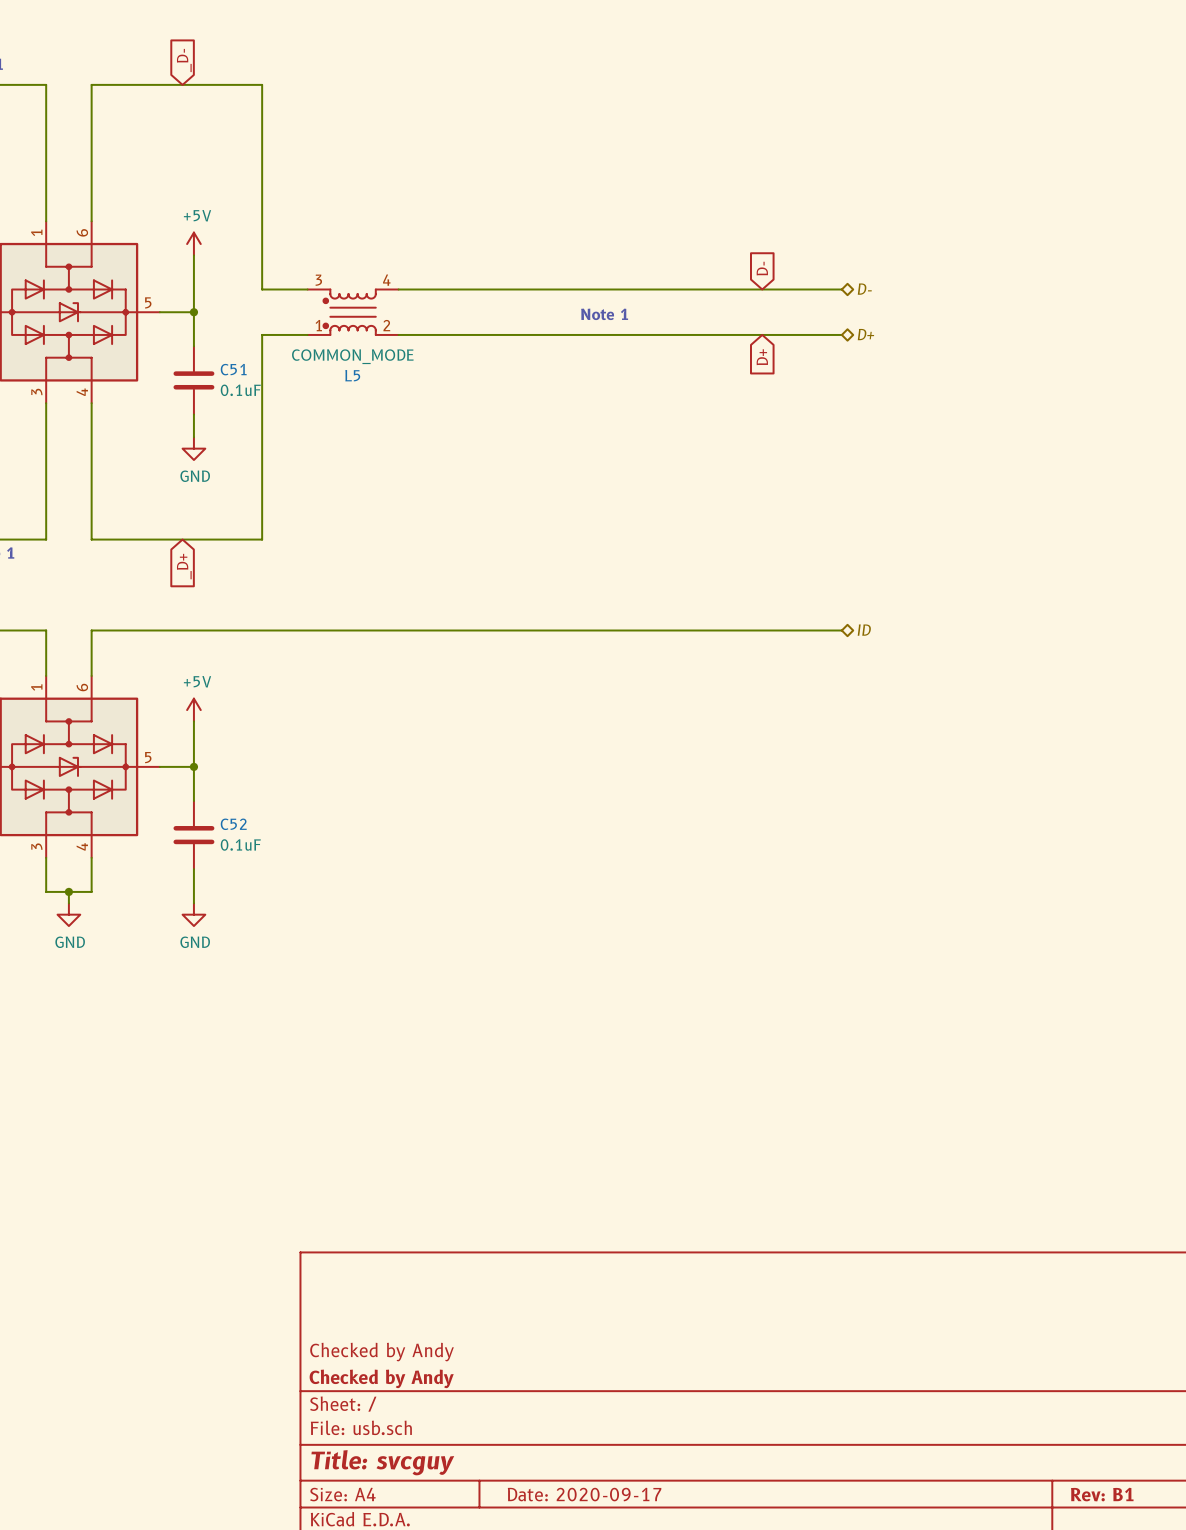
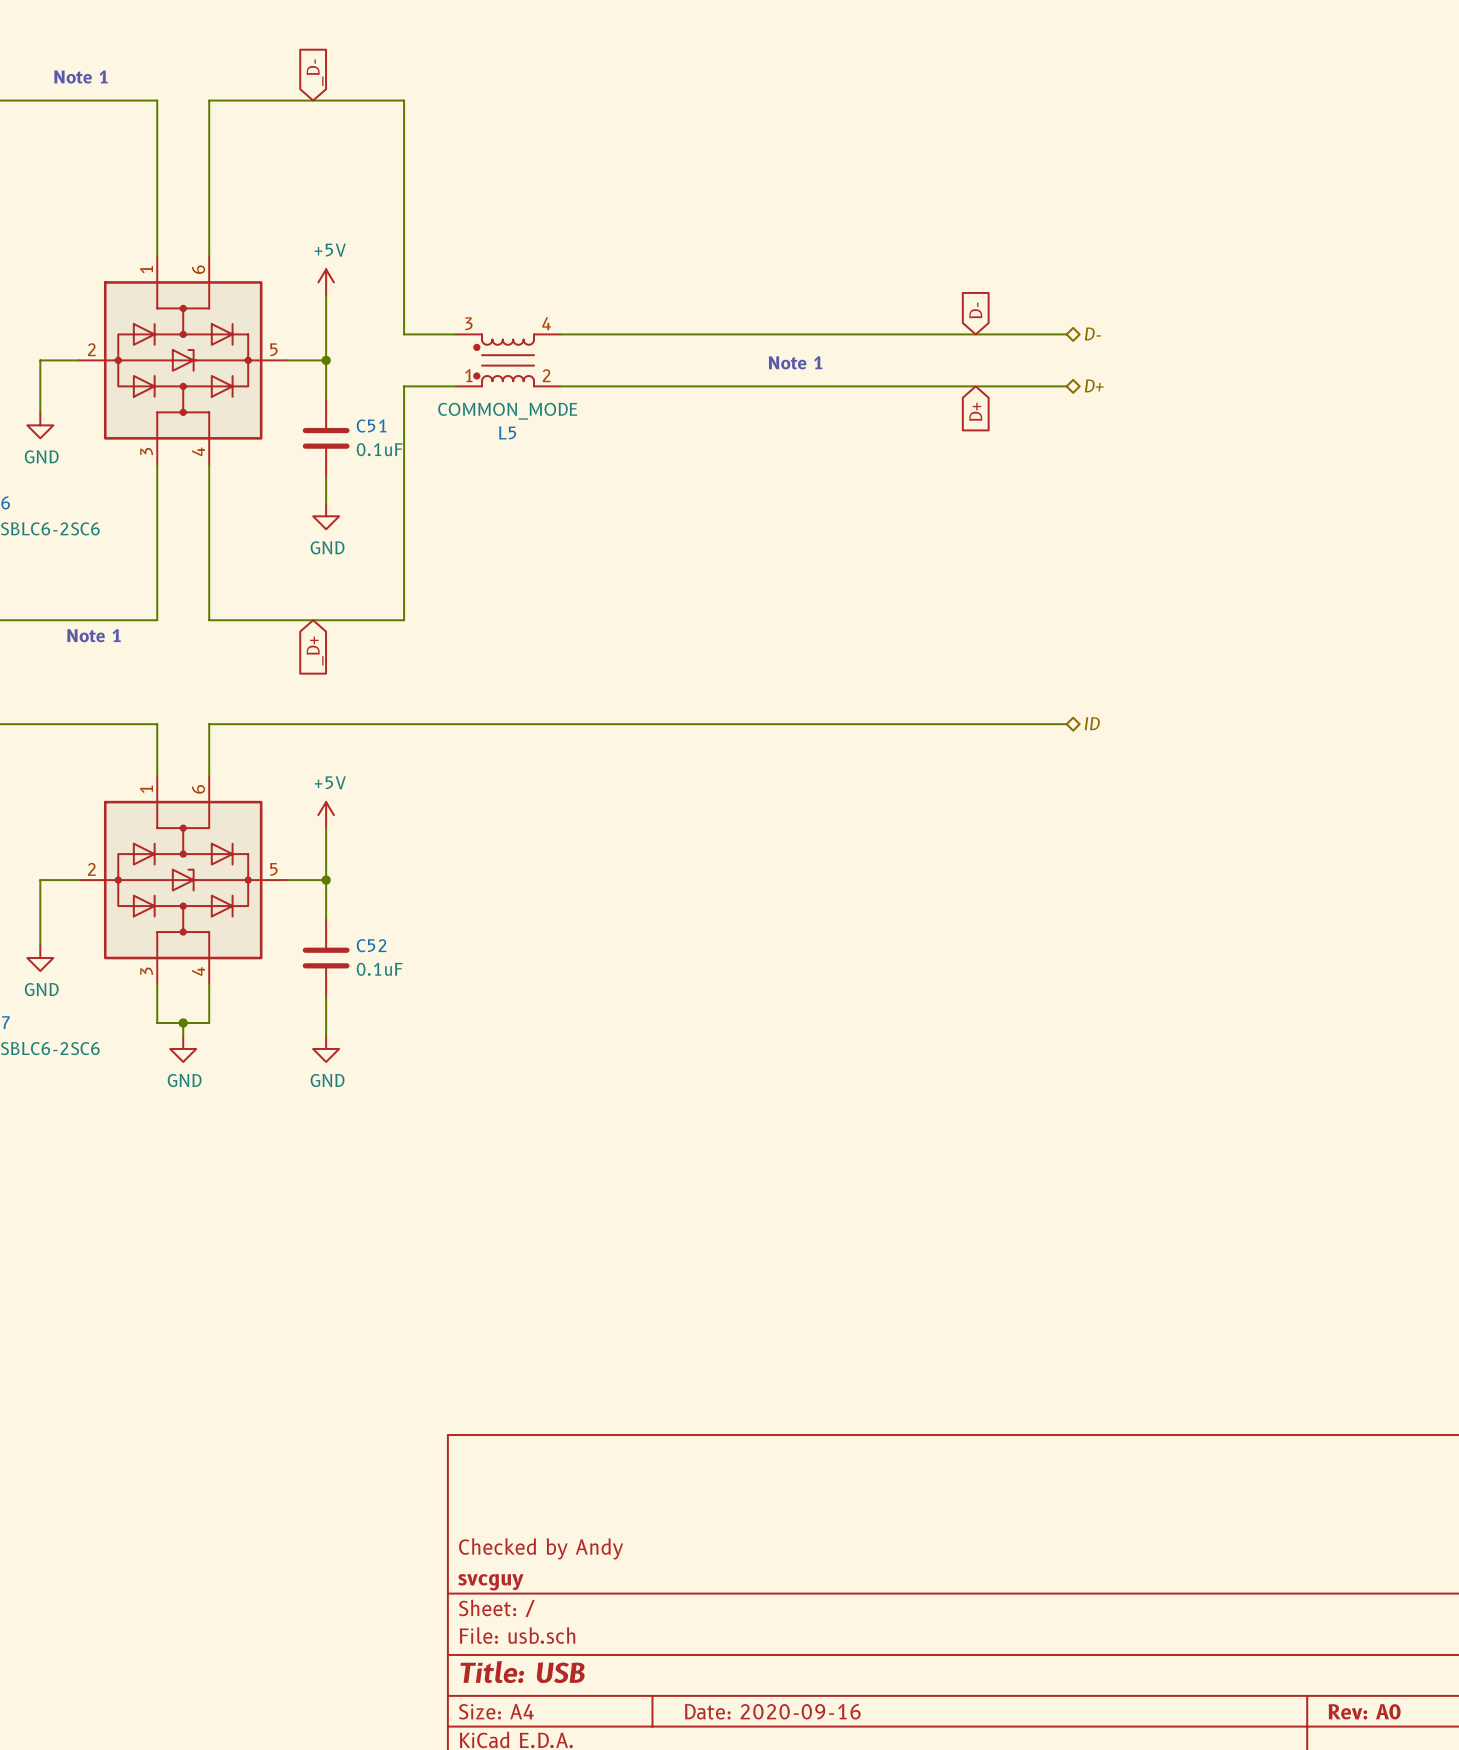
title block: Checked by Andy (381, 1378) -> svcguy (490, 1582)
title block: Title: svcguy (382, 1462) -> Title: USB (522, 1672)
title block: Date: 2020-09-17 (584, 1494) -> Date: 2020-09-16 (772, 1711)
title block: Rev: B1 (1102, 1494) -> Rev: A0 (1364, 1711)

